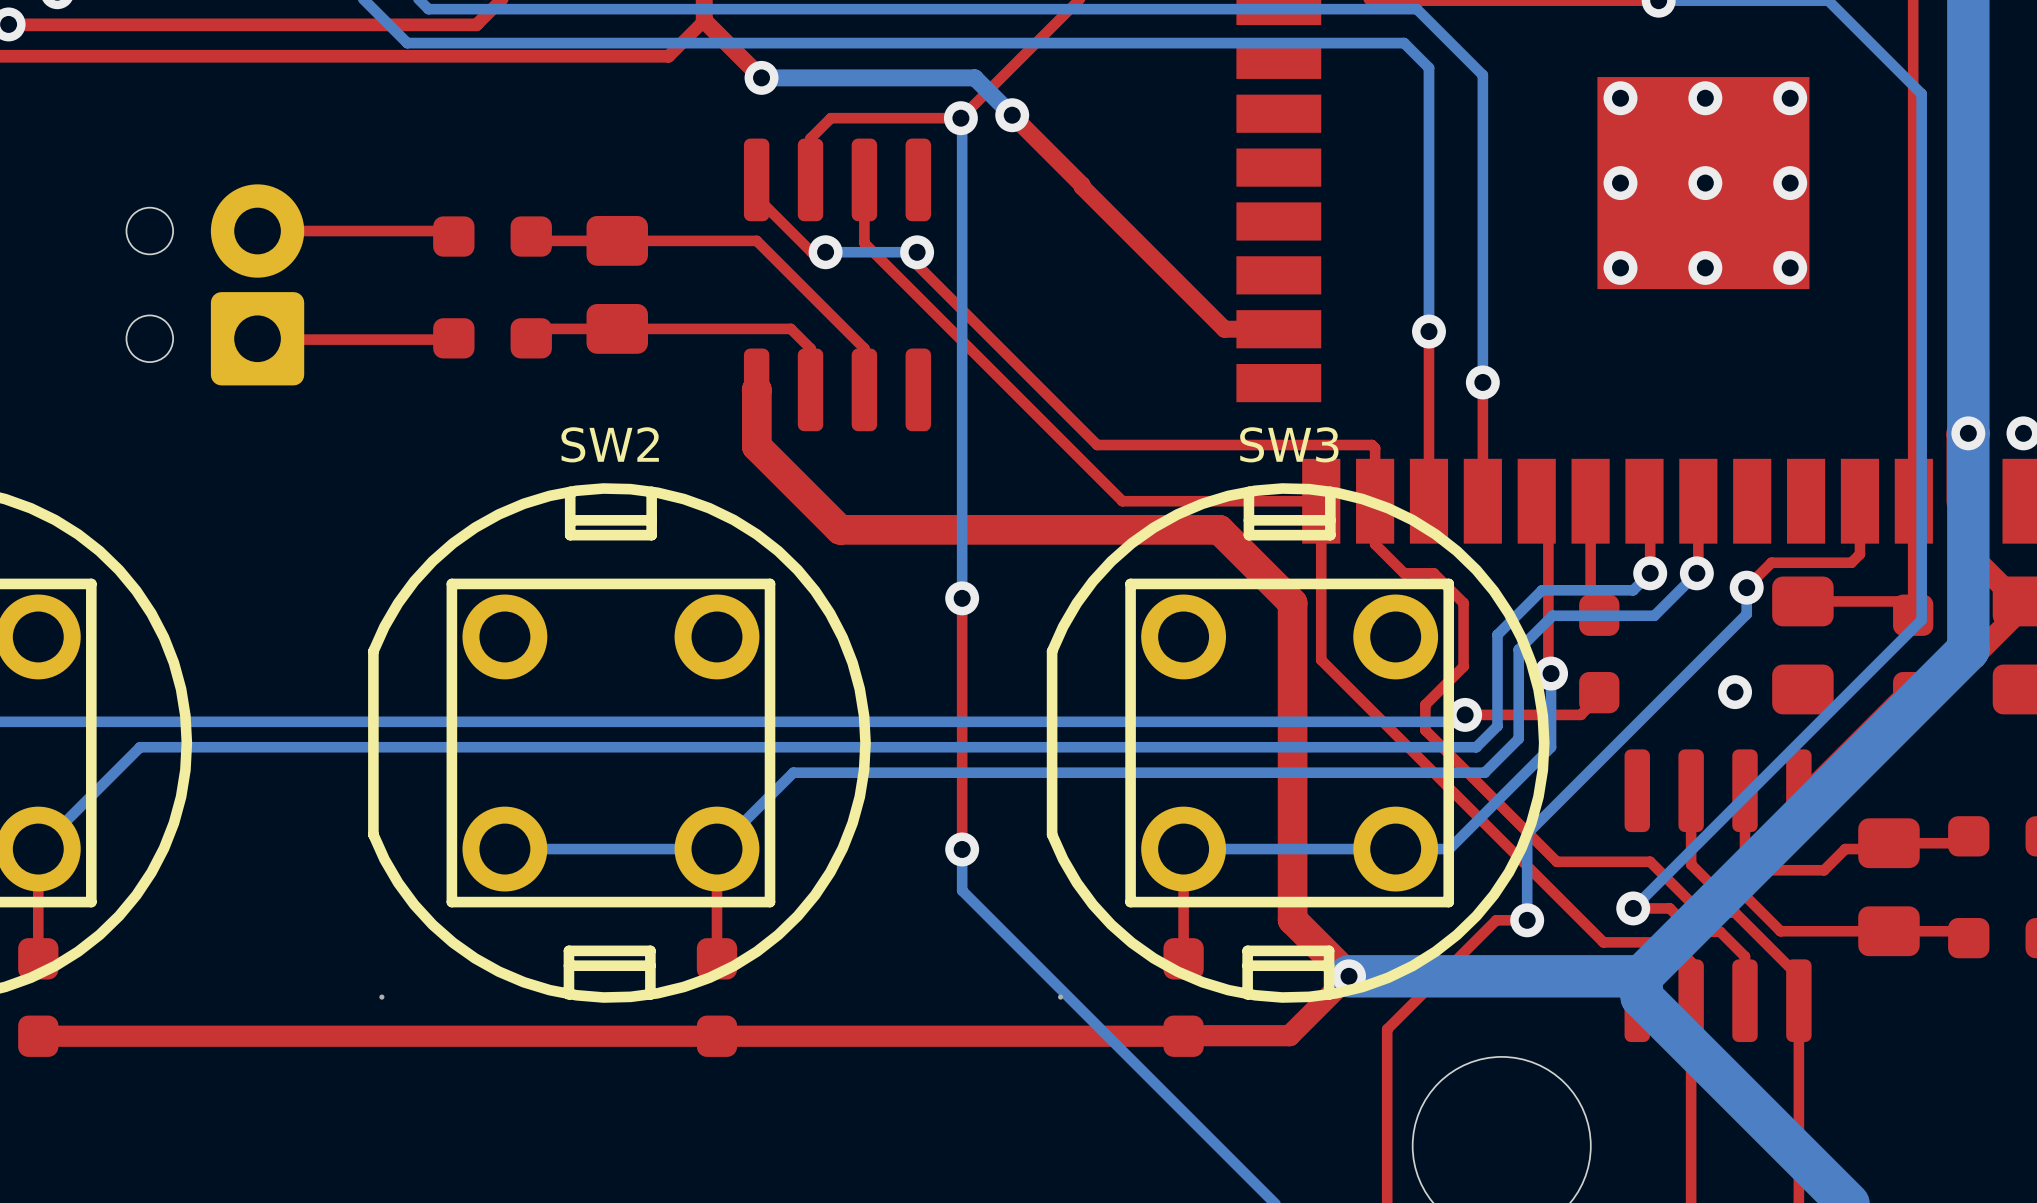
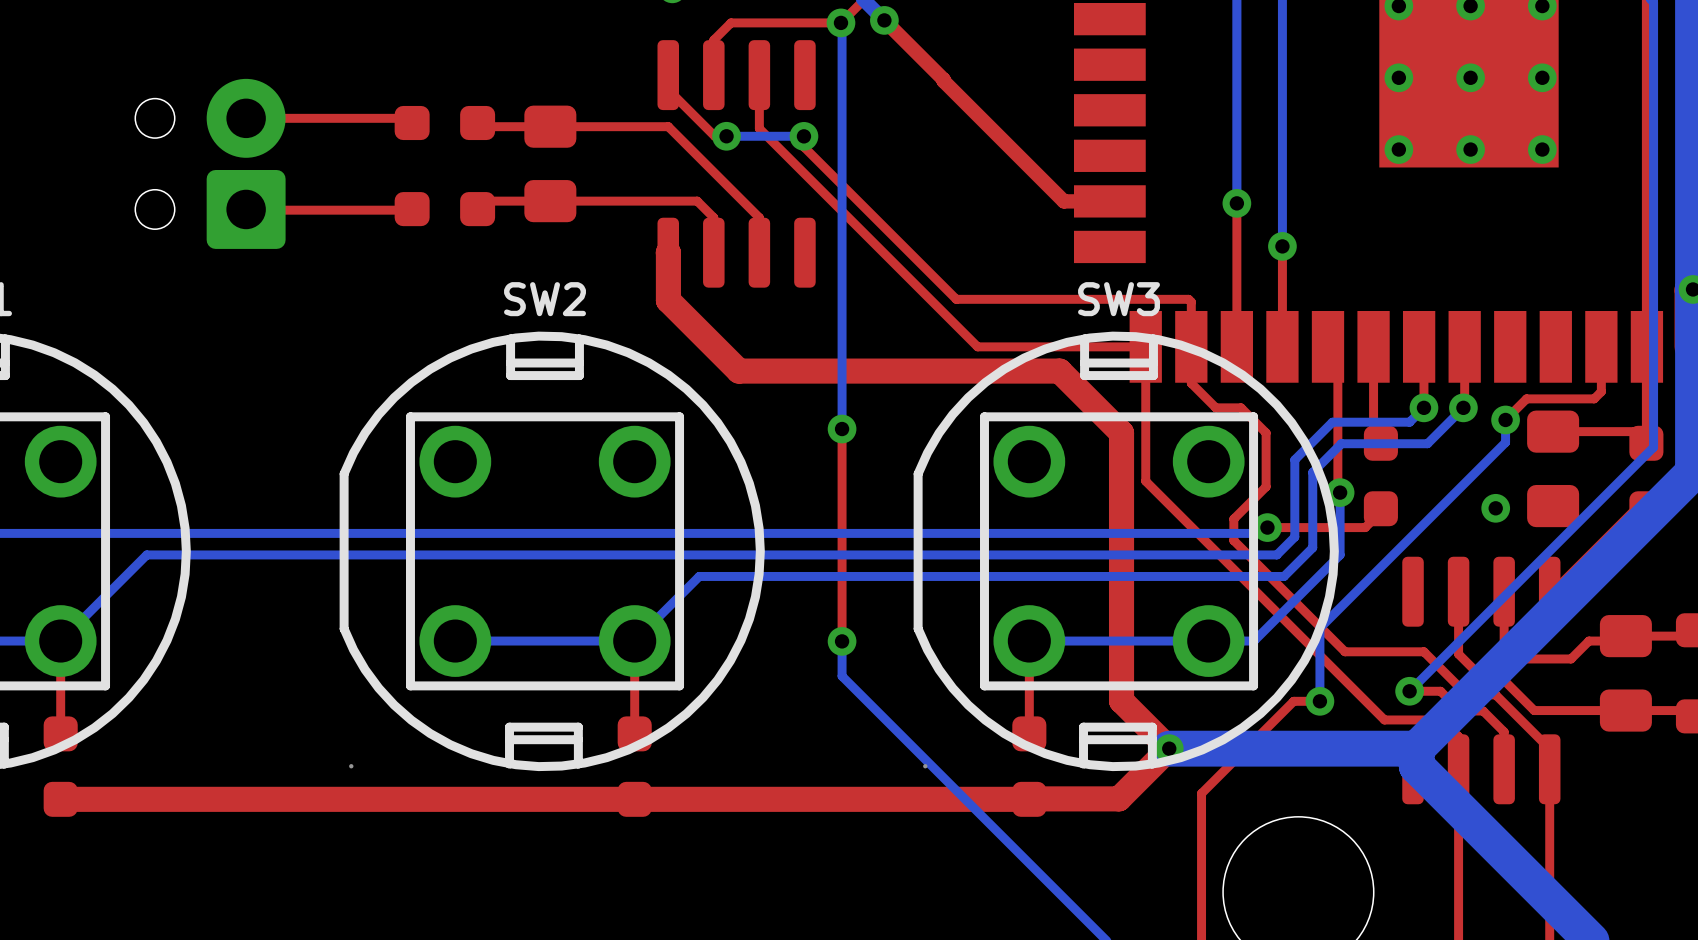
top track width: thin (1349, 976) (1289, 1035) (1184, 1035) -> thick (1169, 748) (1119, 798) (1029, 798)
top track width: thin (1183, 1036) (38, 1036) -> thick (1029, 799) (60, 799)

